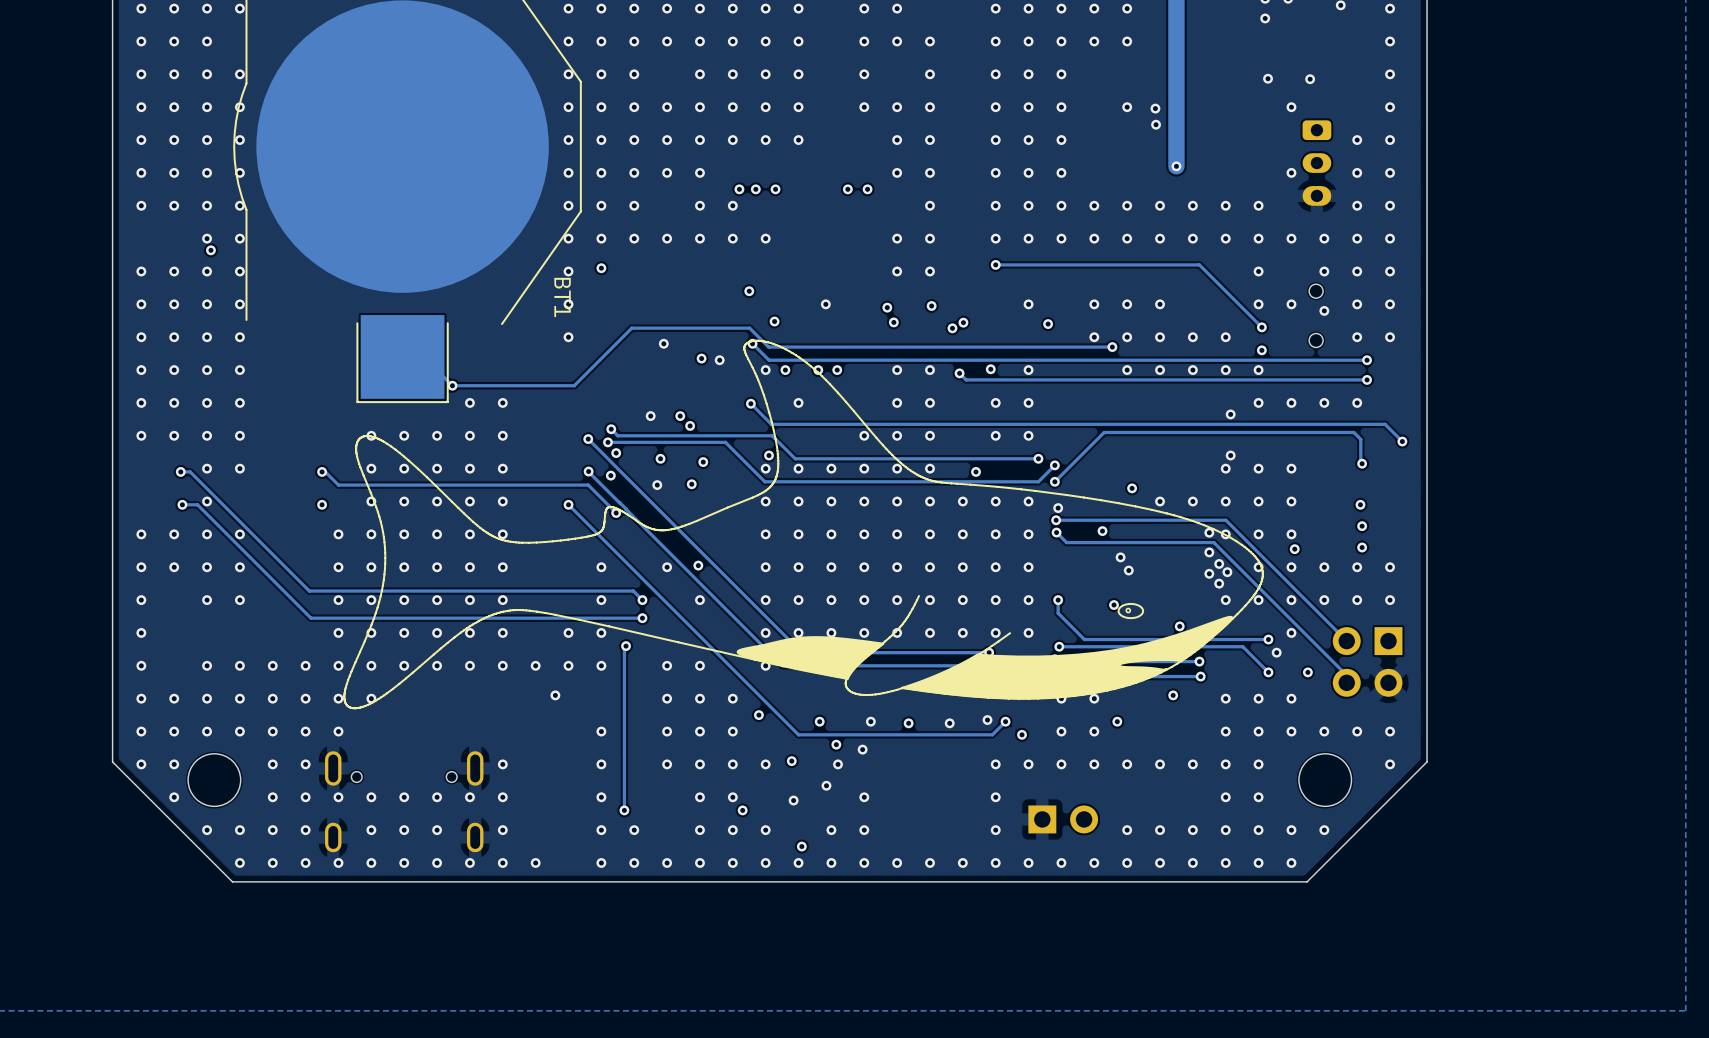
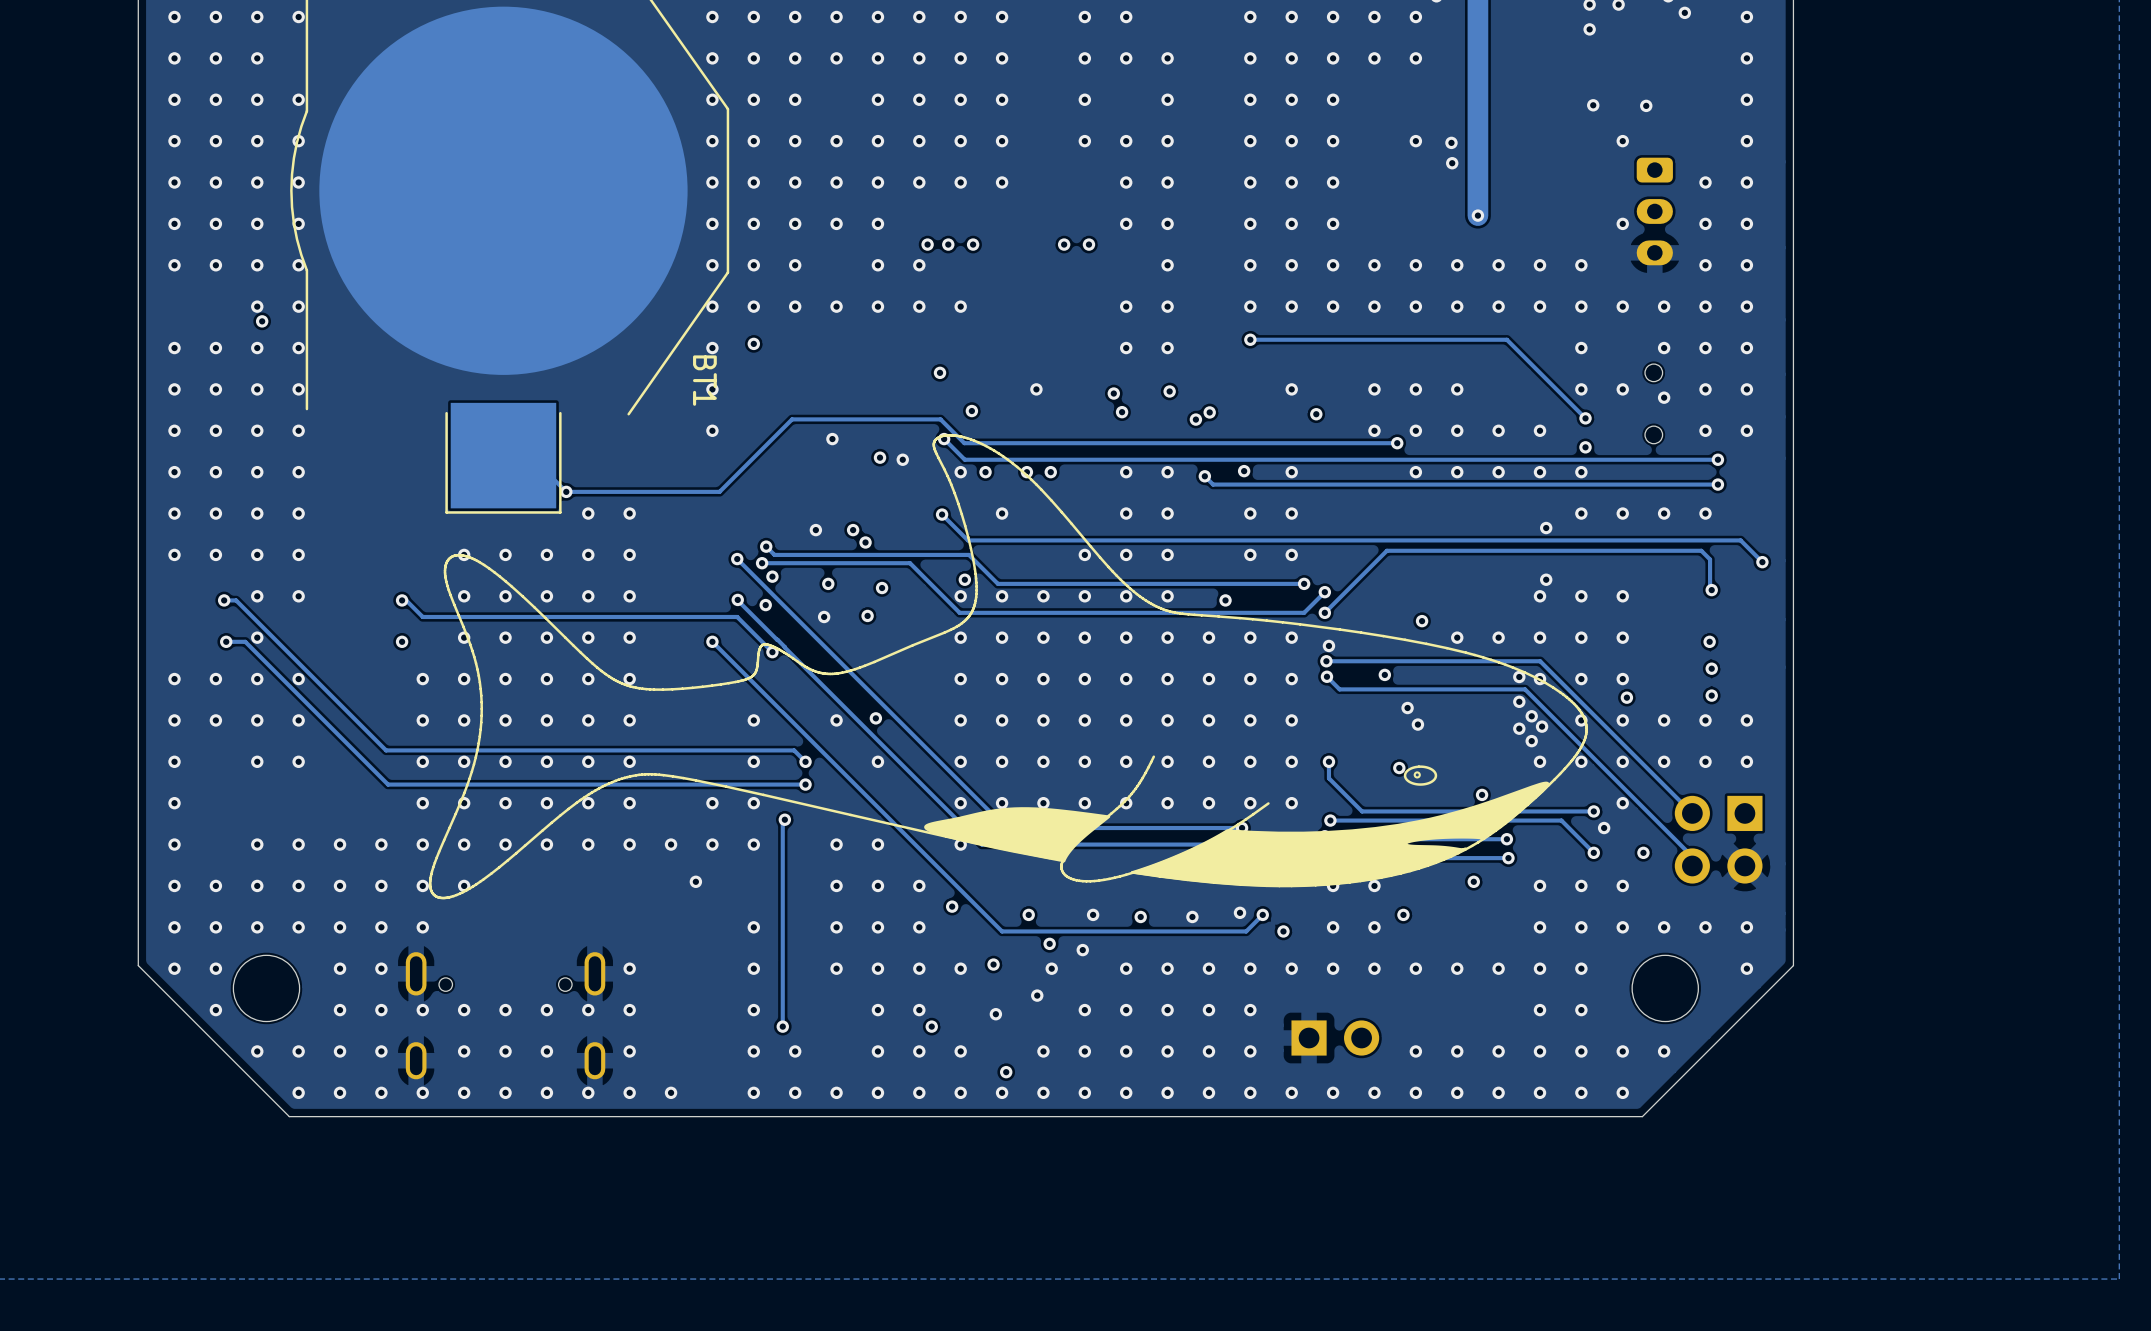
via: none -> (1126, 968)
via: none -> (1167, 968)
via: none -> (1208, 968)
via: none -> (1126, 1010)
via: none -> (1167, 1010)
via: none -> (1208, 1010)
via: none -> (1126, 1051)
via: none -> (1167, 1051)
via: none -> (1208, 1051)

